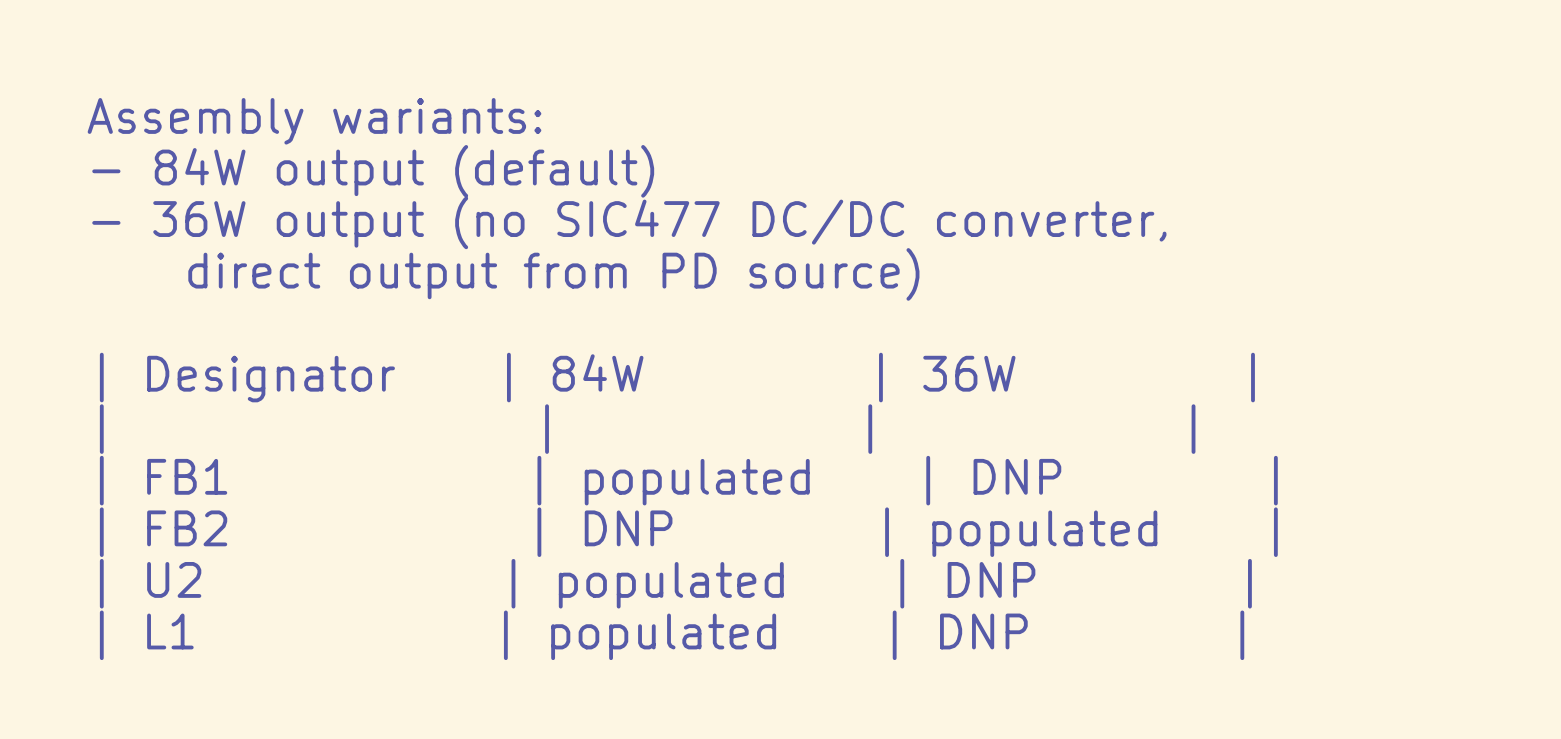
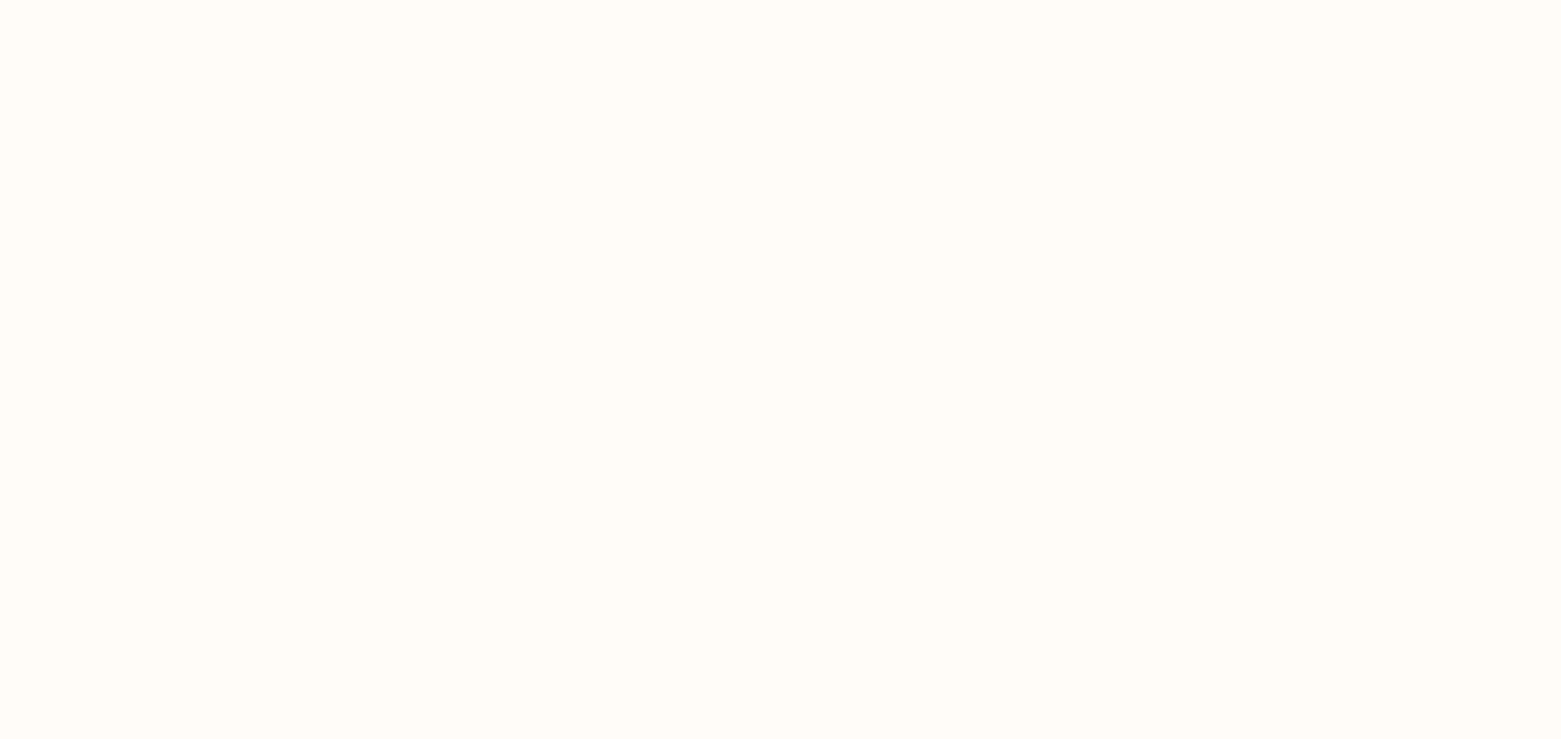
text: Assembly wariants: (314, 121) -> none
text: - 84W output (default) (373, 171) -> none
text: - 36W output (no SIC477 DC/DC converter, (629, 222) -> none
text: direct output from PD source) (553, 274) -> none
text: | Designator | 84W | 36W | (677, 377) -> none
text: | | | | (647, 429) -> none
text: | FB1 | populated | DNP | (688, 480) -> none
text: | FB2 | DNP | populated | (688, 532) -> none
text: | U2 | populated | DNP | (675, 583) -> none
text: | L1 | populated | DNP | (672, 635) -> none

